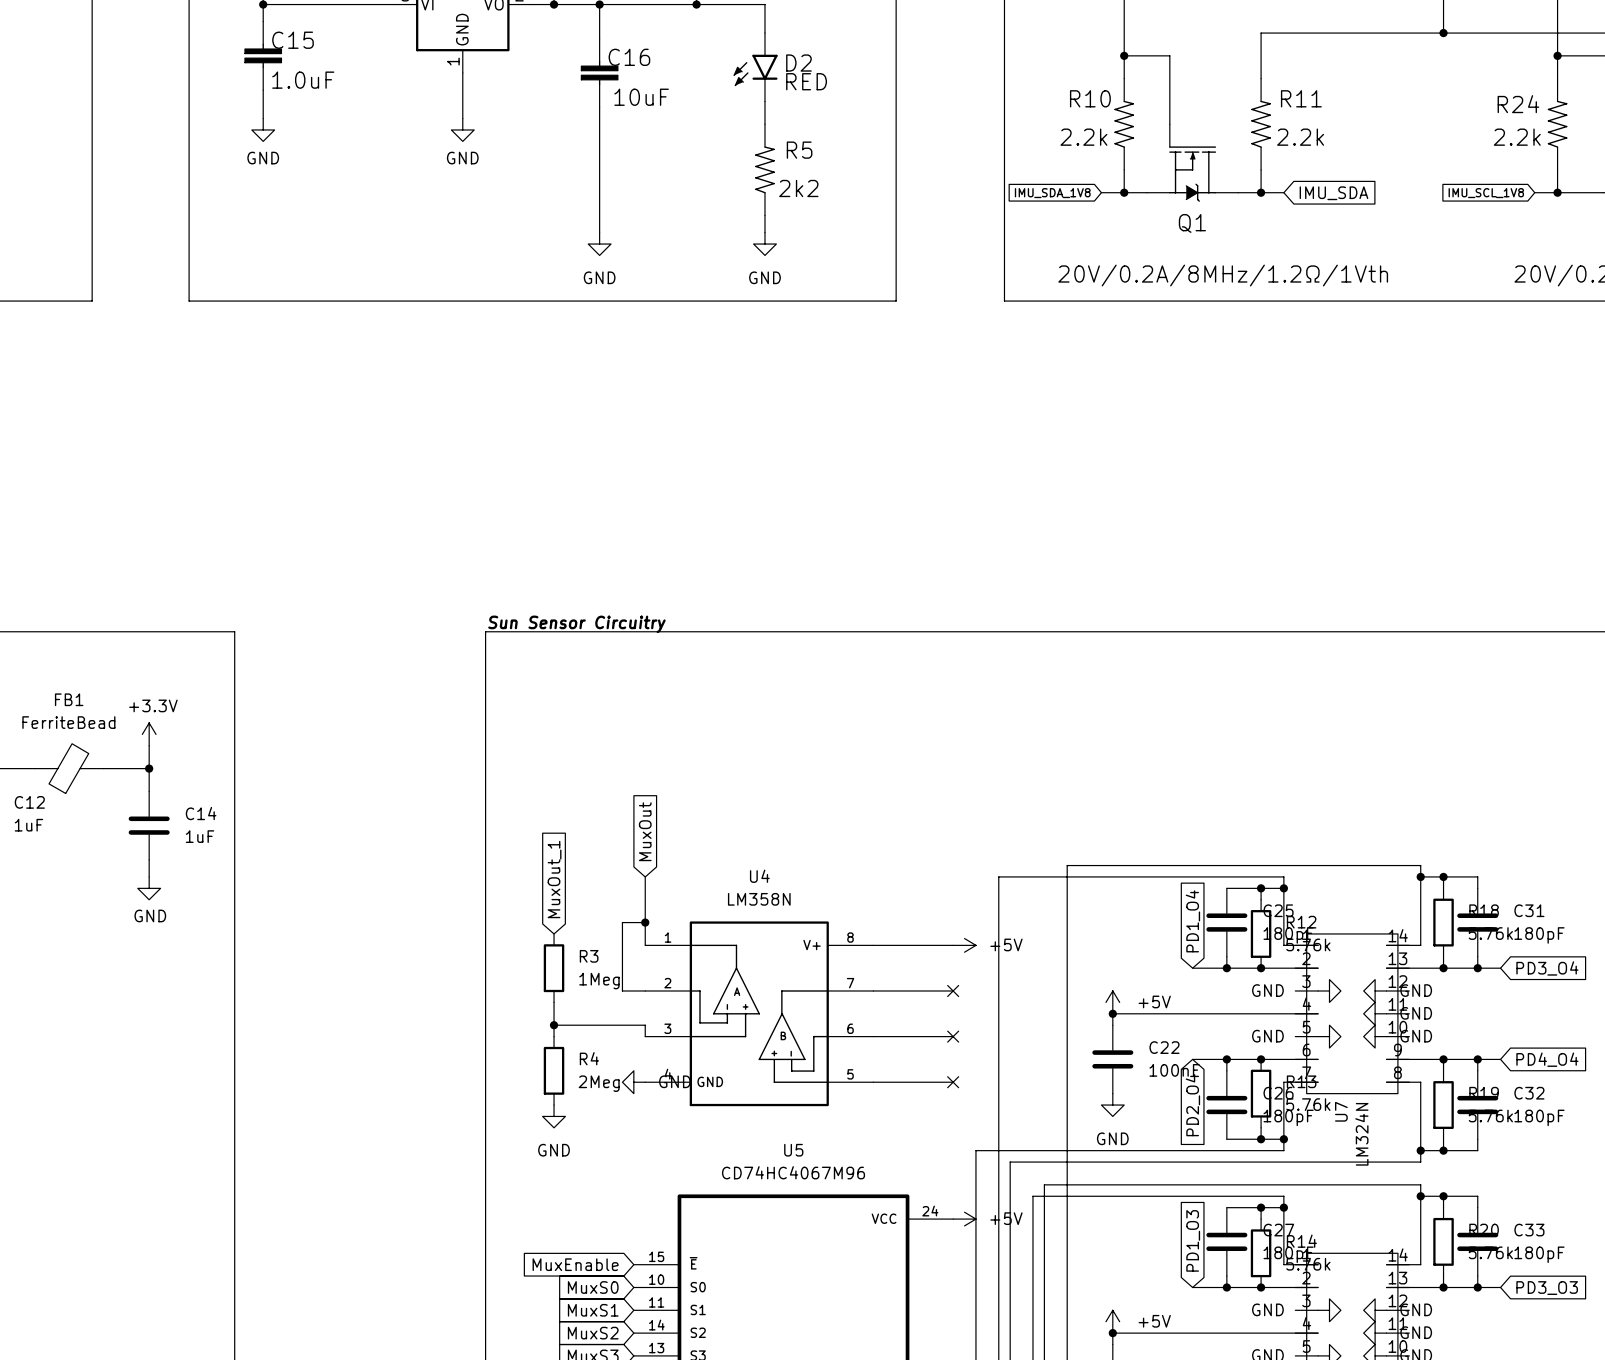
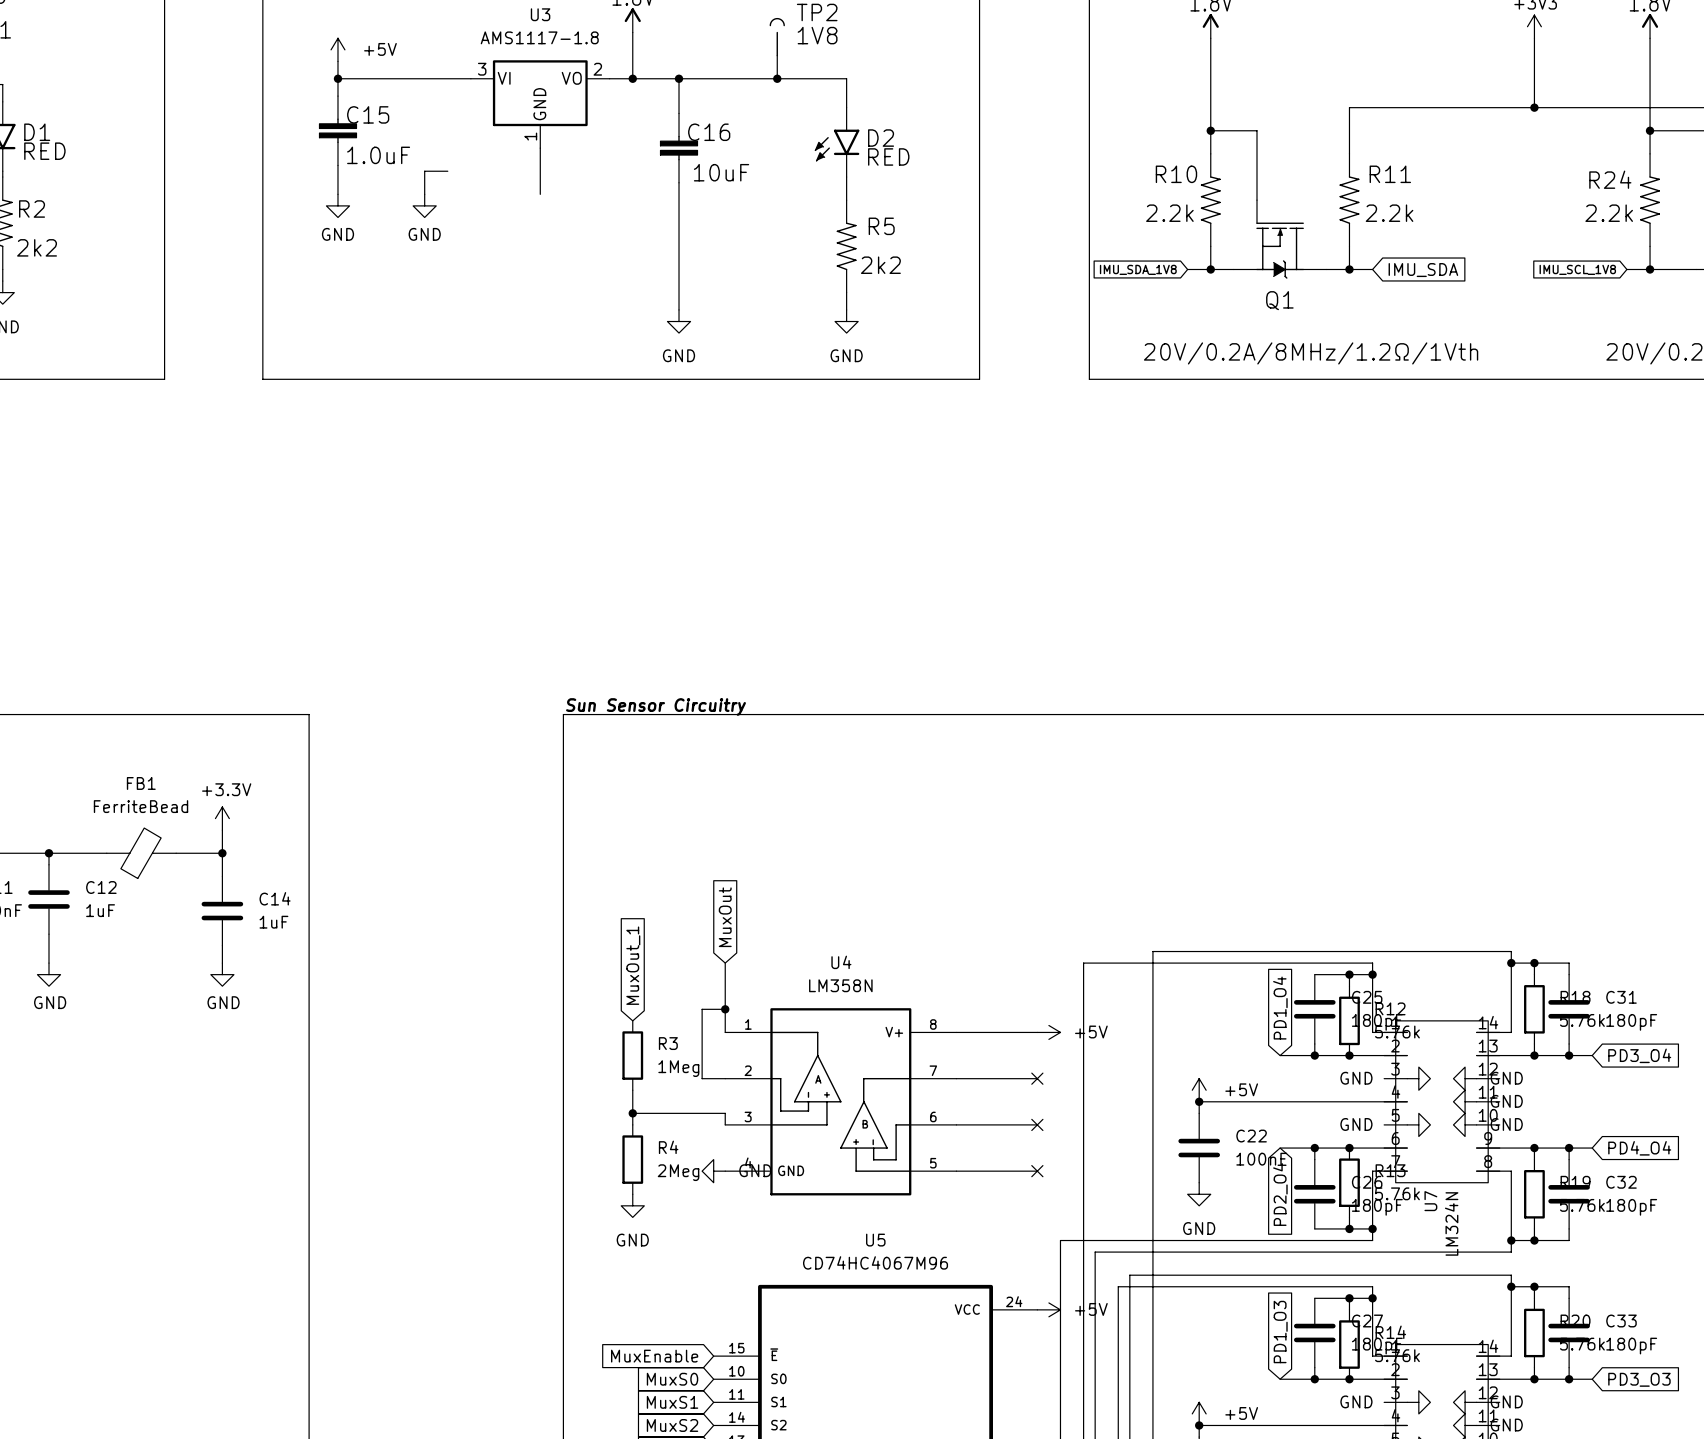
wire: none -> (447, 171) (424, 171) (424, 194)
power symbol position: GND (462, 129) -> GND (424, 205)

